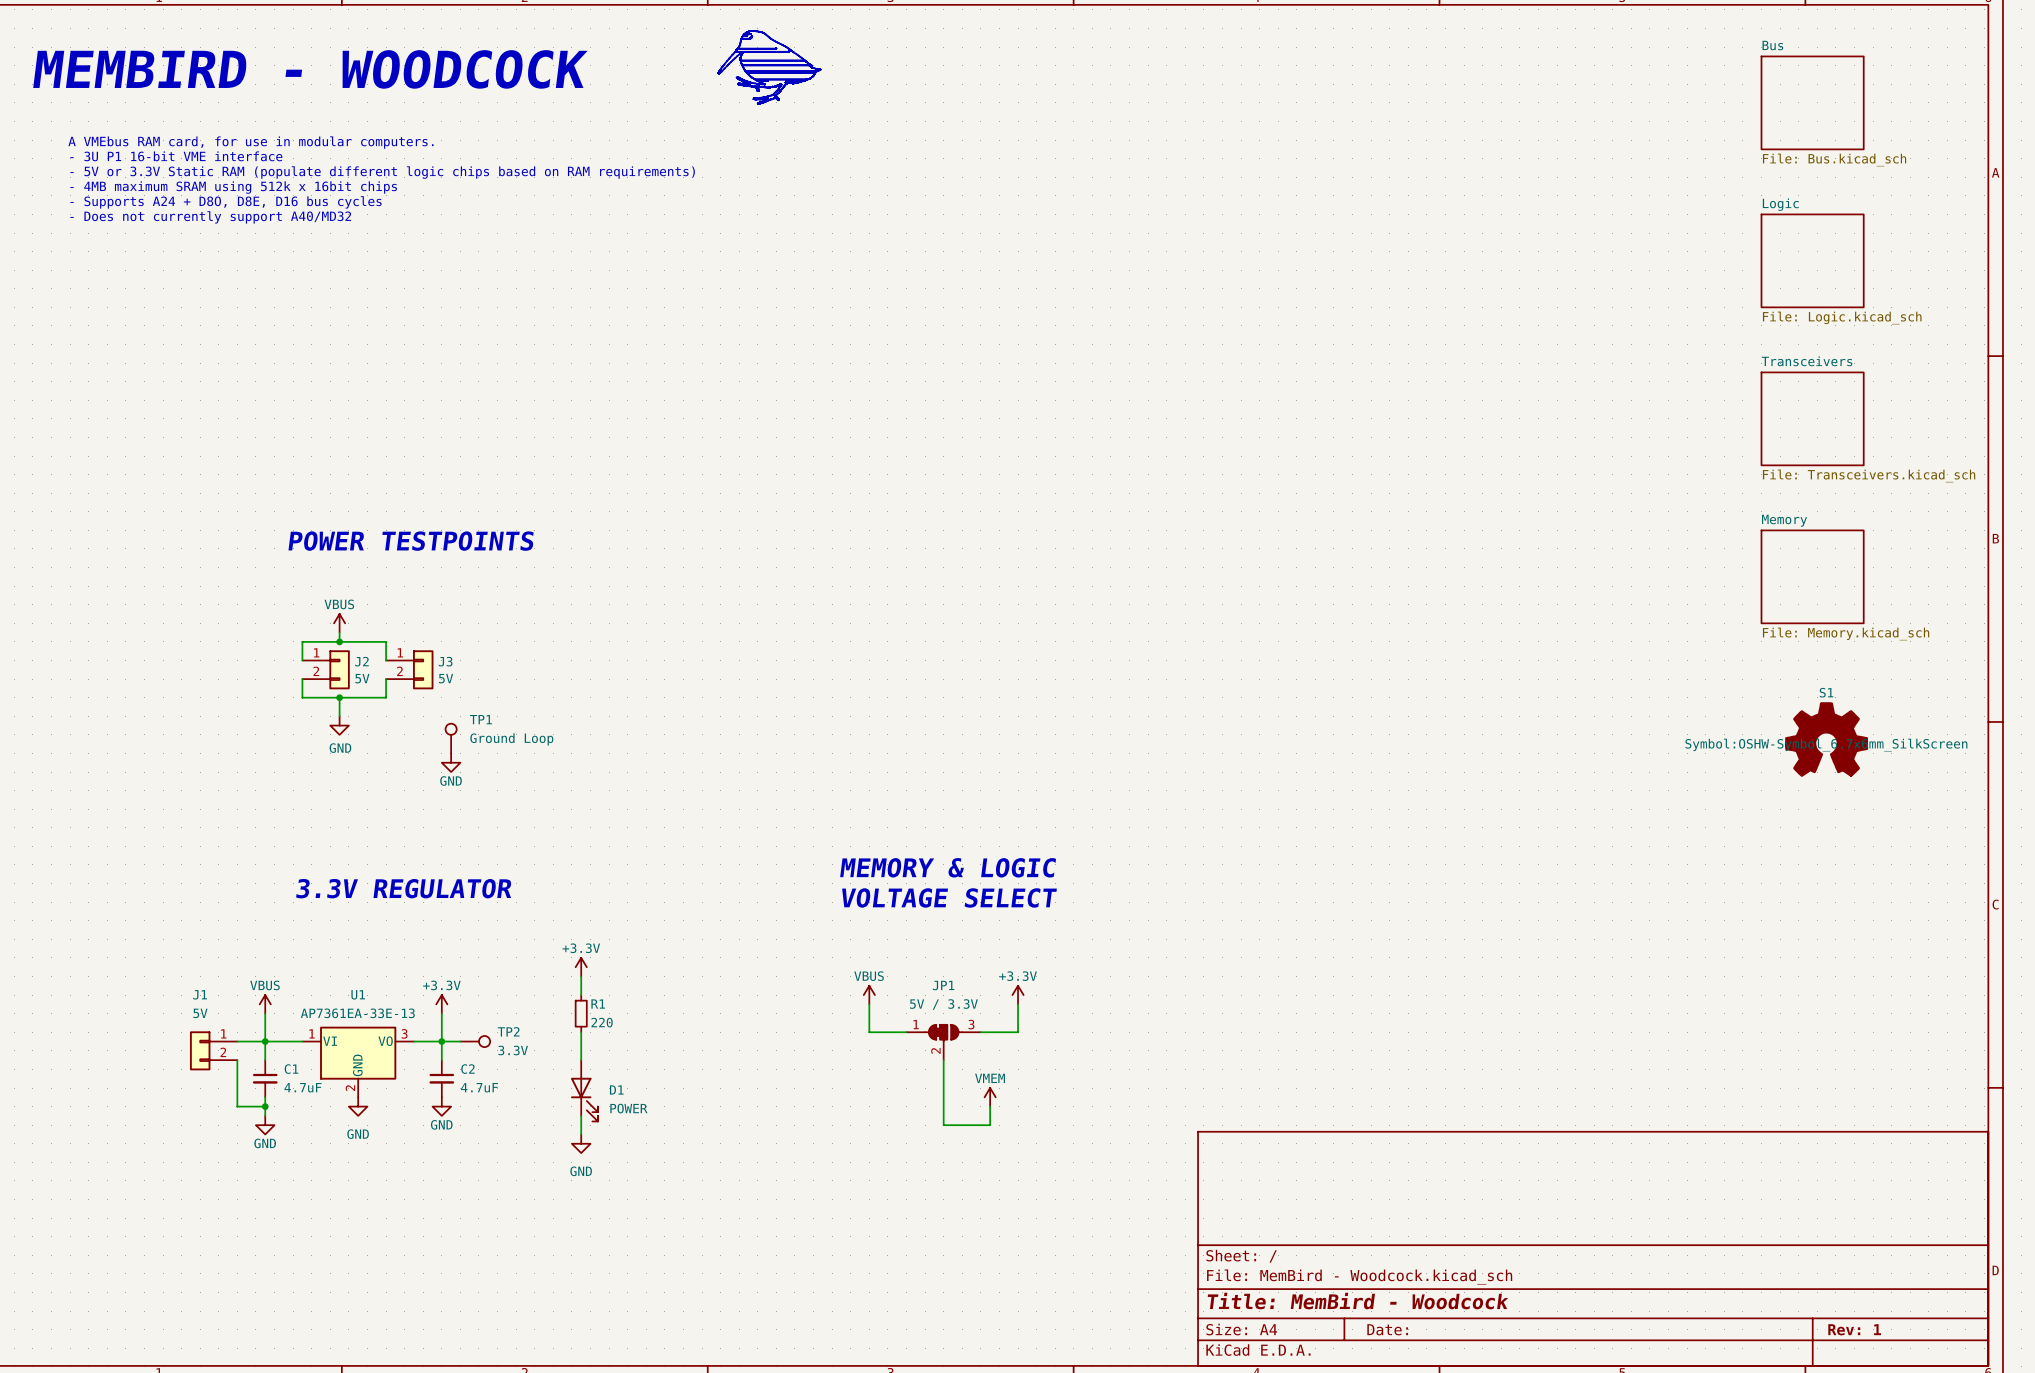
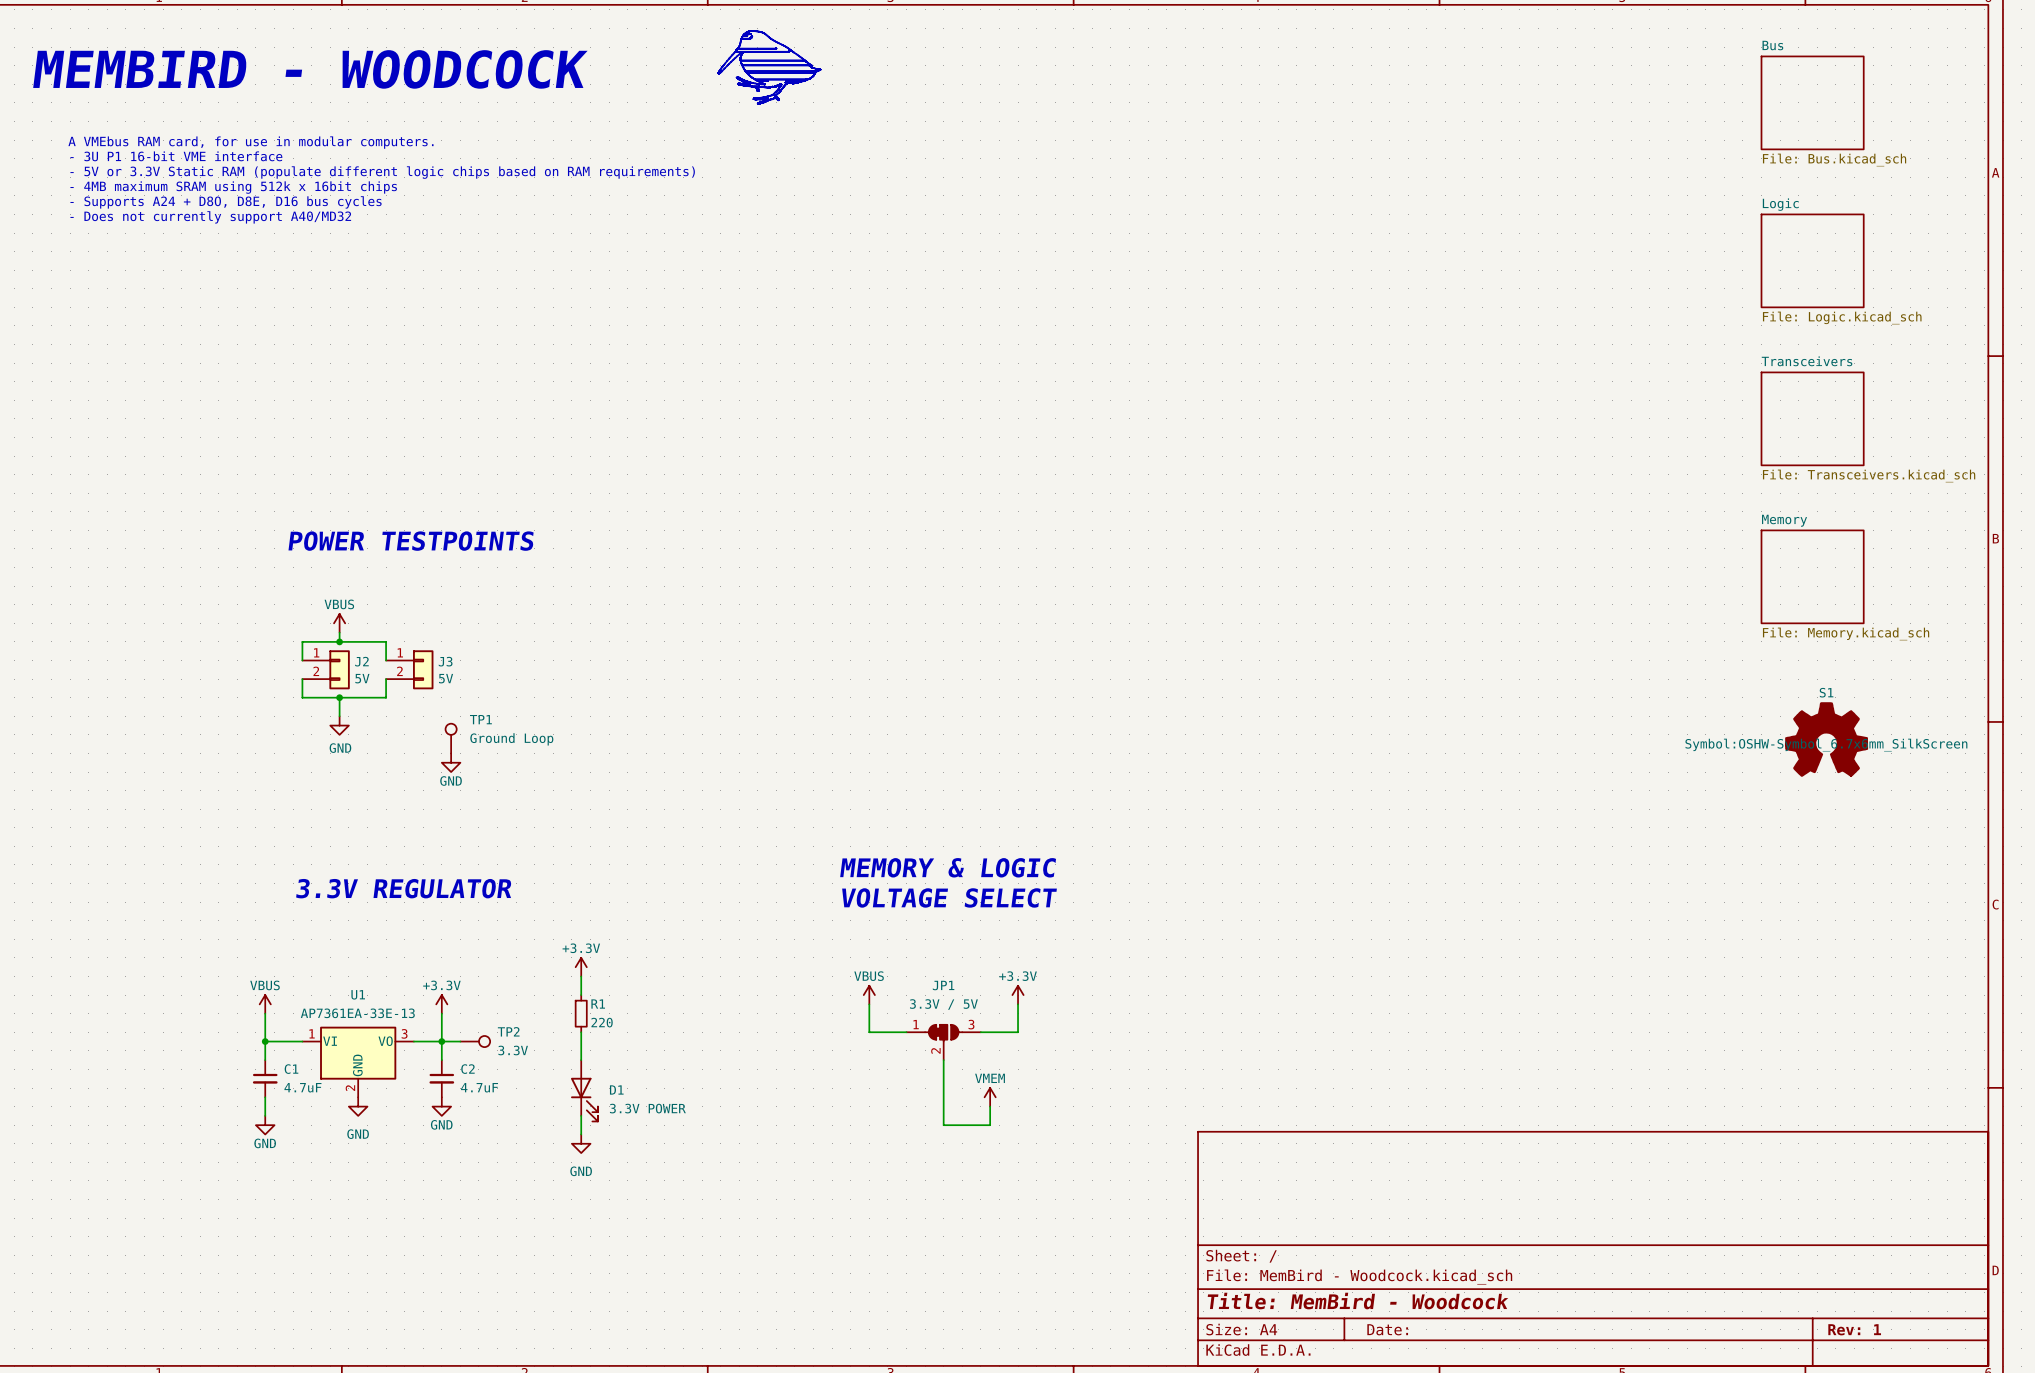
JP1 value: 5V / 3.3V (943, 1004) -> 3.3V / 5V (943, 1004)
wire: (237, 1041) (265, 1041) -> none
J1: 5V (213, 1050) -> none
wire: (237, 1060) (237, 1106) (265, 1106) -> none
junction: (265, 1106) -> none
D1 value: POWER (628, 1108) -> 3.3V POWER (647, 1108)

